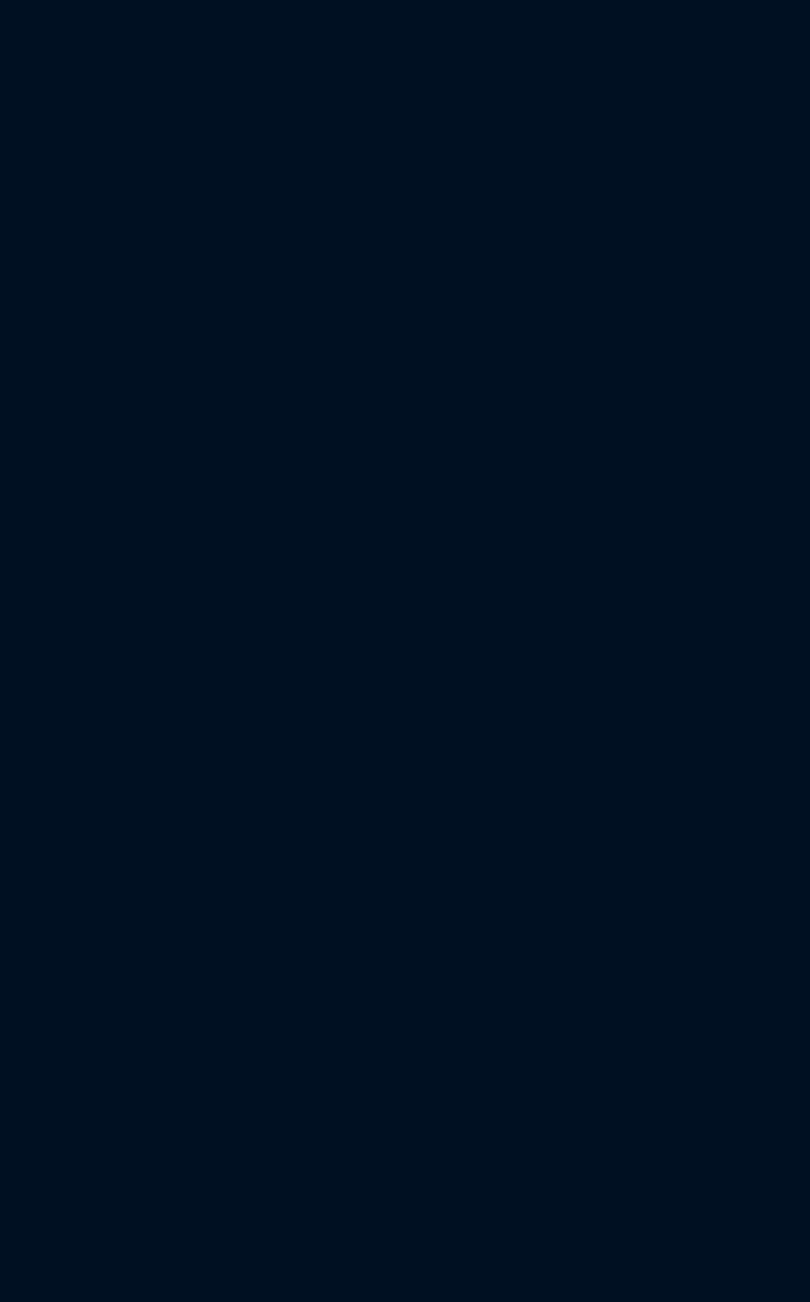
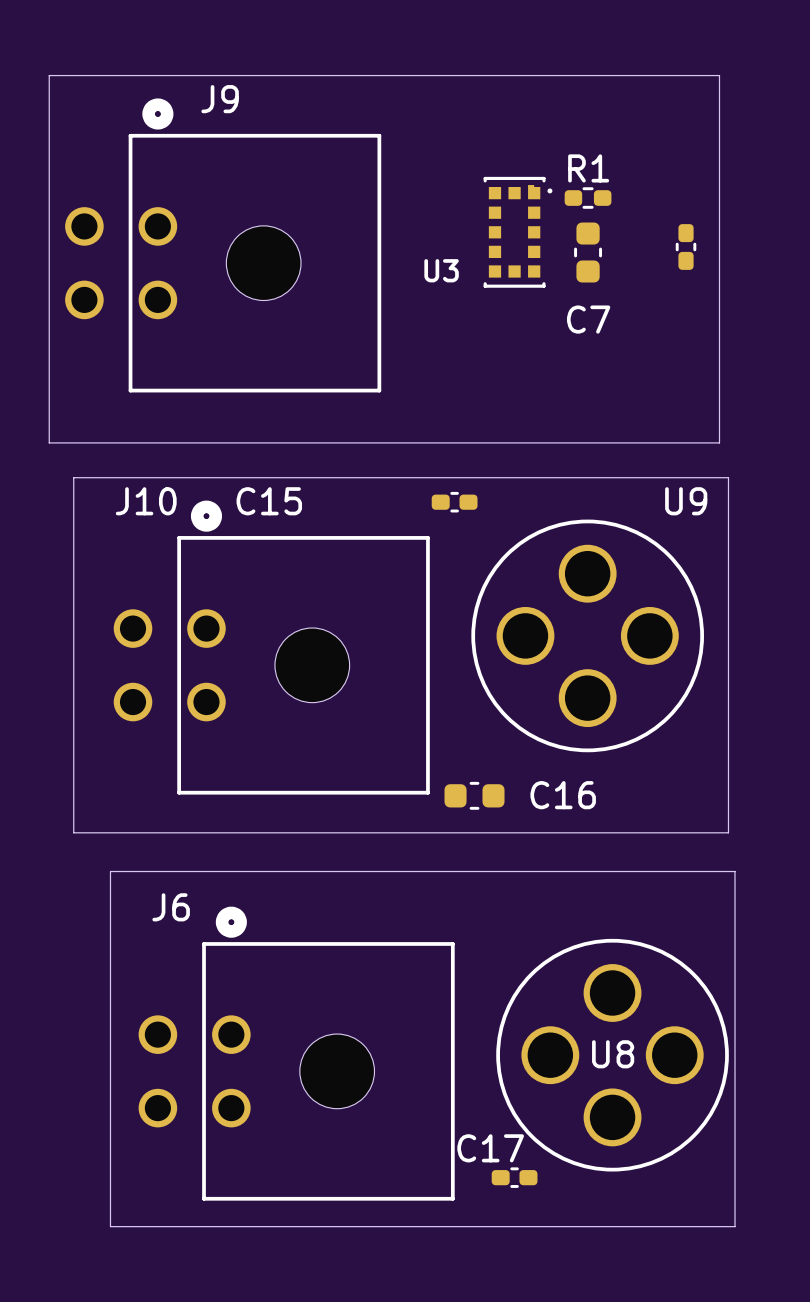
board edge: none -> (49, 75) (719, 75) (719, 442) (49, 442) (49, 75)
R1: none -> (588, 198)
U3: none -> (518, 232)
J9: none -> (223, 245)
part: none -> (686, 247)
C7: none -> (588, 252)
board edge: none -> (73, 477) (728, 477) (728, 832) (73, 832) (73, 477)
C15: none -> (454, 502)
U9: none -> (587, 635)
J10: none -> (271, 647)
C16: none -> (474, 795)
board edge: none -> (110, 871) (734, 871) (734, 1226) (110, 1226) (110, 871)
J6: none -> (296, 1053)
U8: none -> (612, 1055)
C17: none -> (514, 1177)

